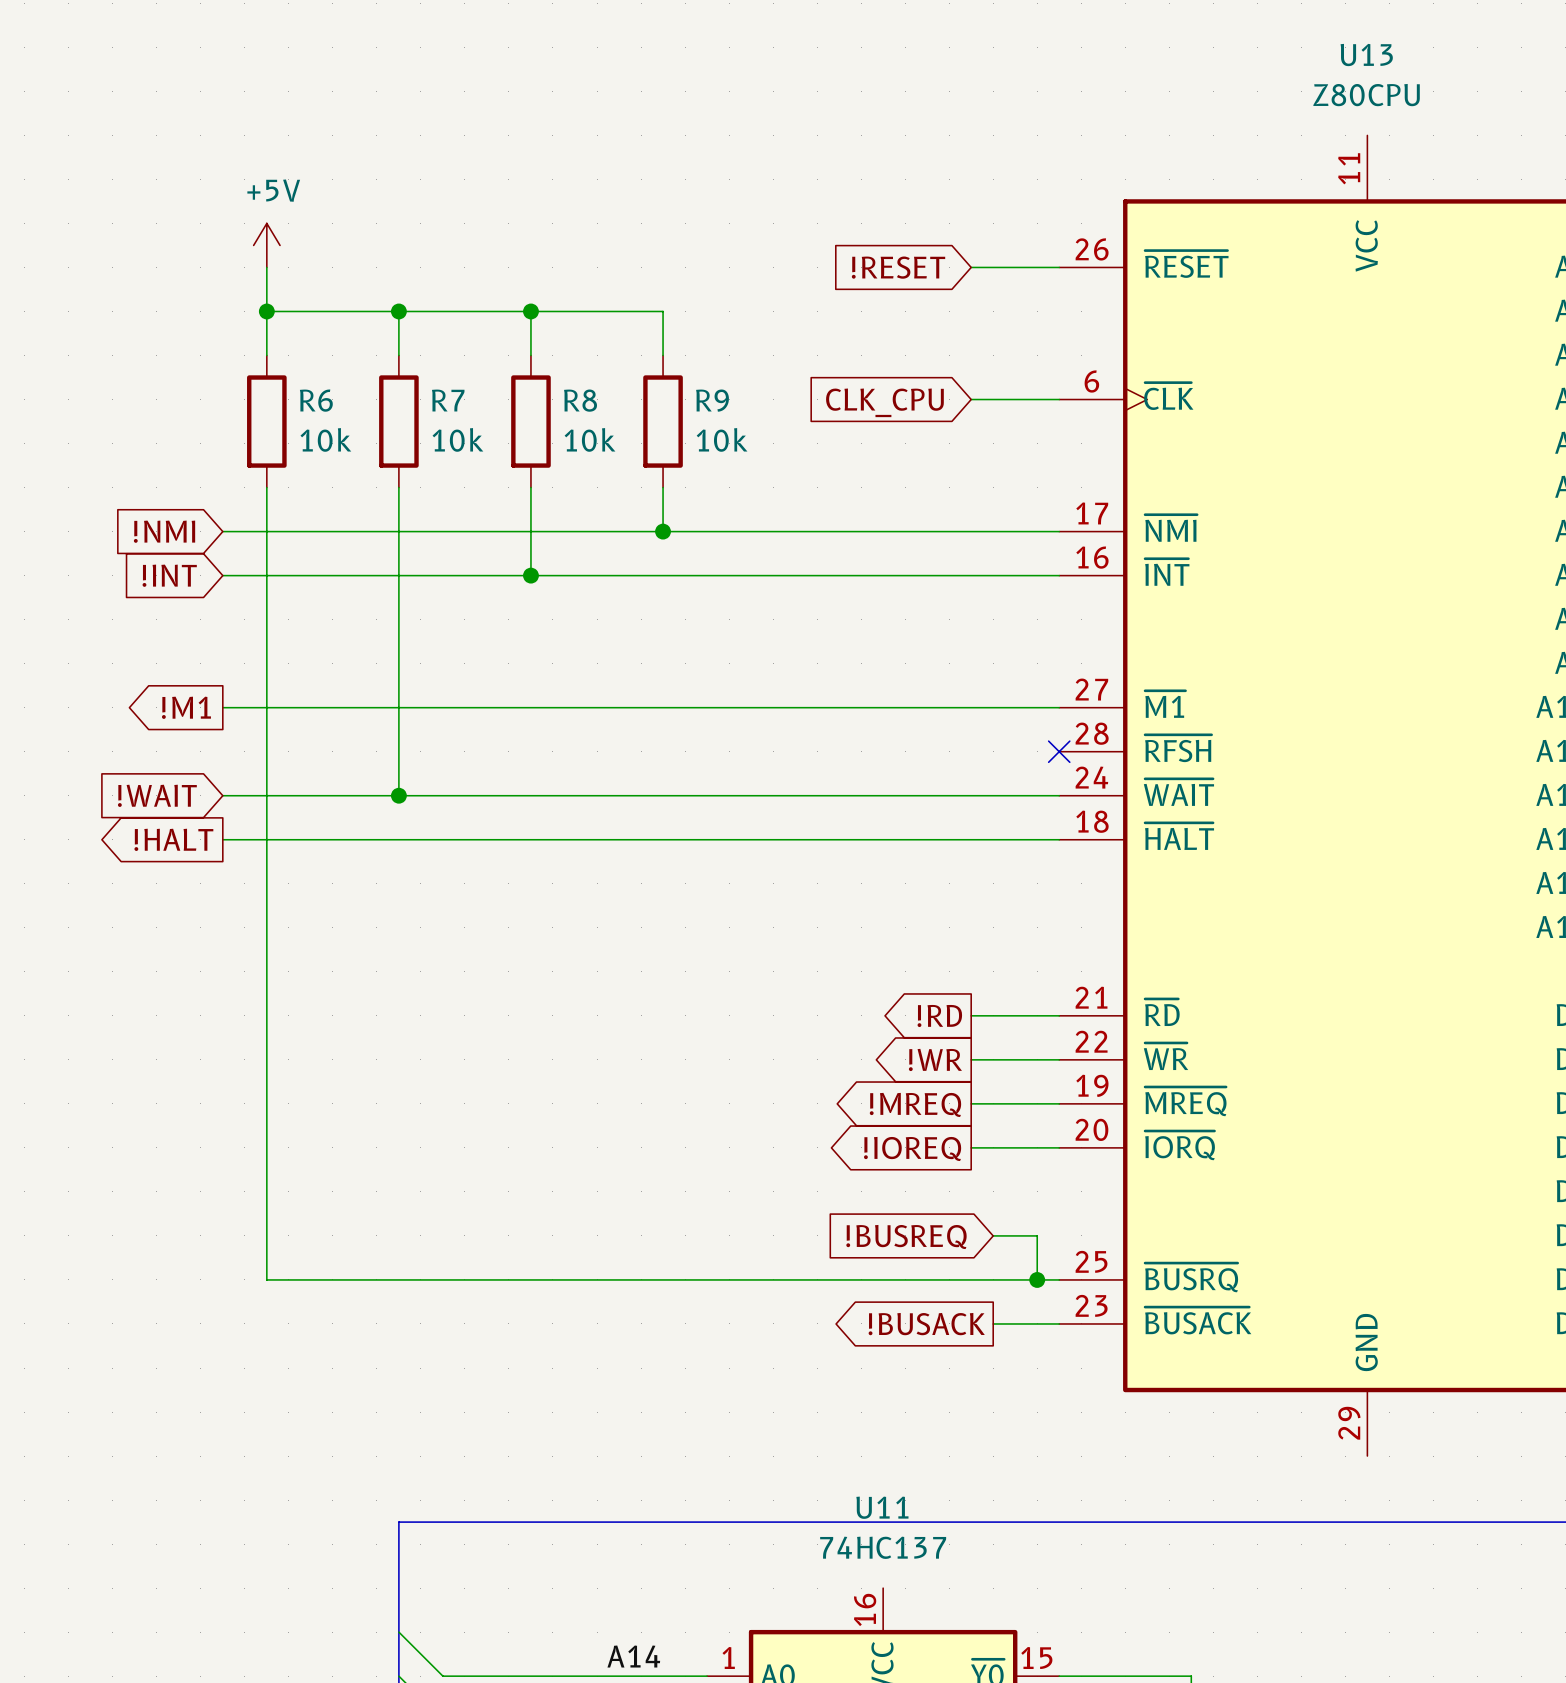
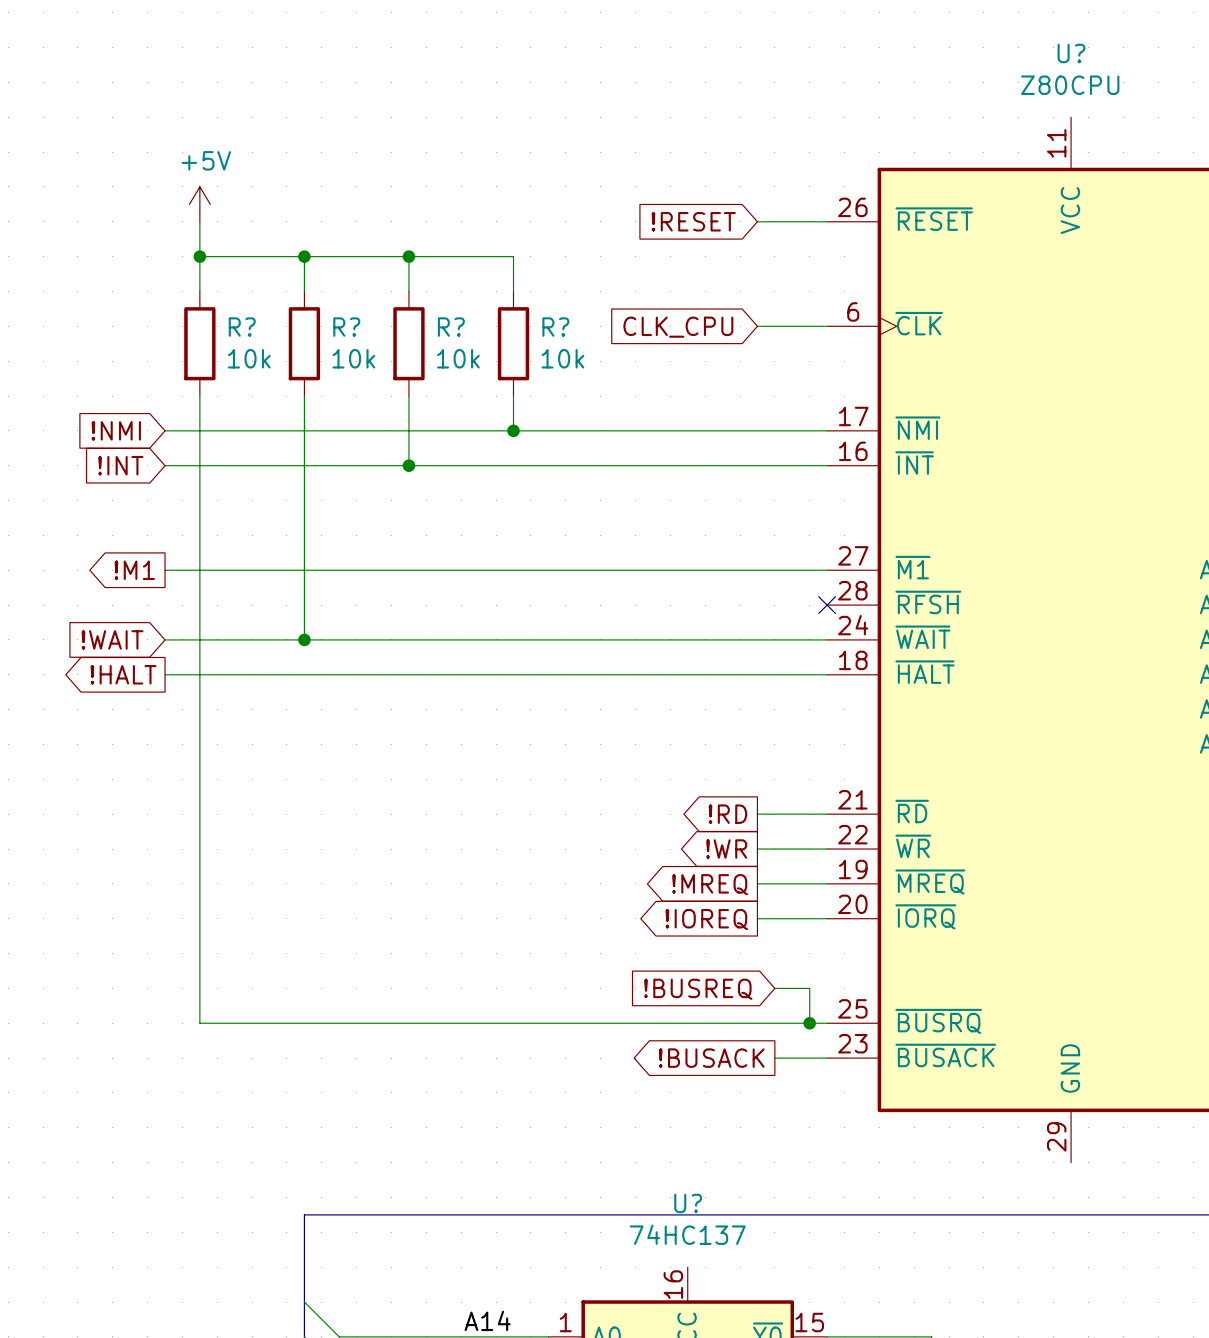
U13 name: U13 (1366, 55) -> U? (1071, 53)
R6 name: R6 (316, 400) -> R? (242, 327)
R7 name: R7 (448, 400) -> R? (346, 327)
R8 name: R8 (580, 400) -> R? (451, 327)
R9 name: R9 (712, 400) -> R? (555, 327)
U11 name: U11 (882, 1507) -> U? (688, 1203)

